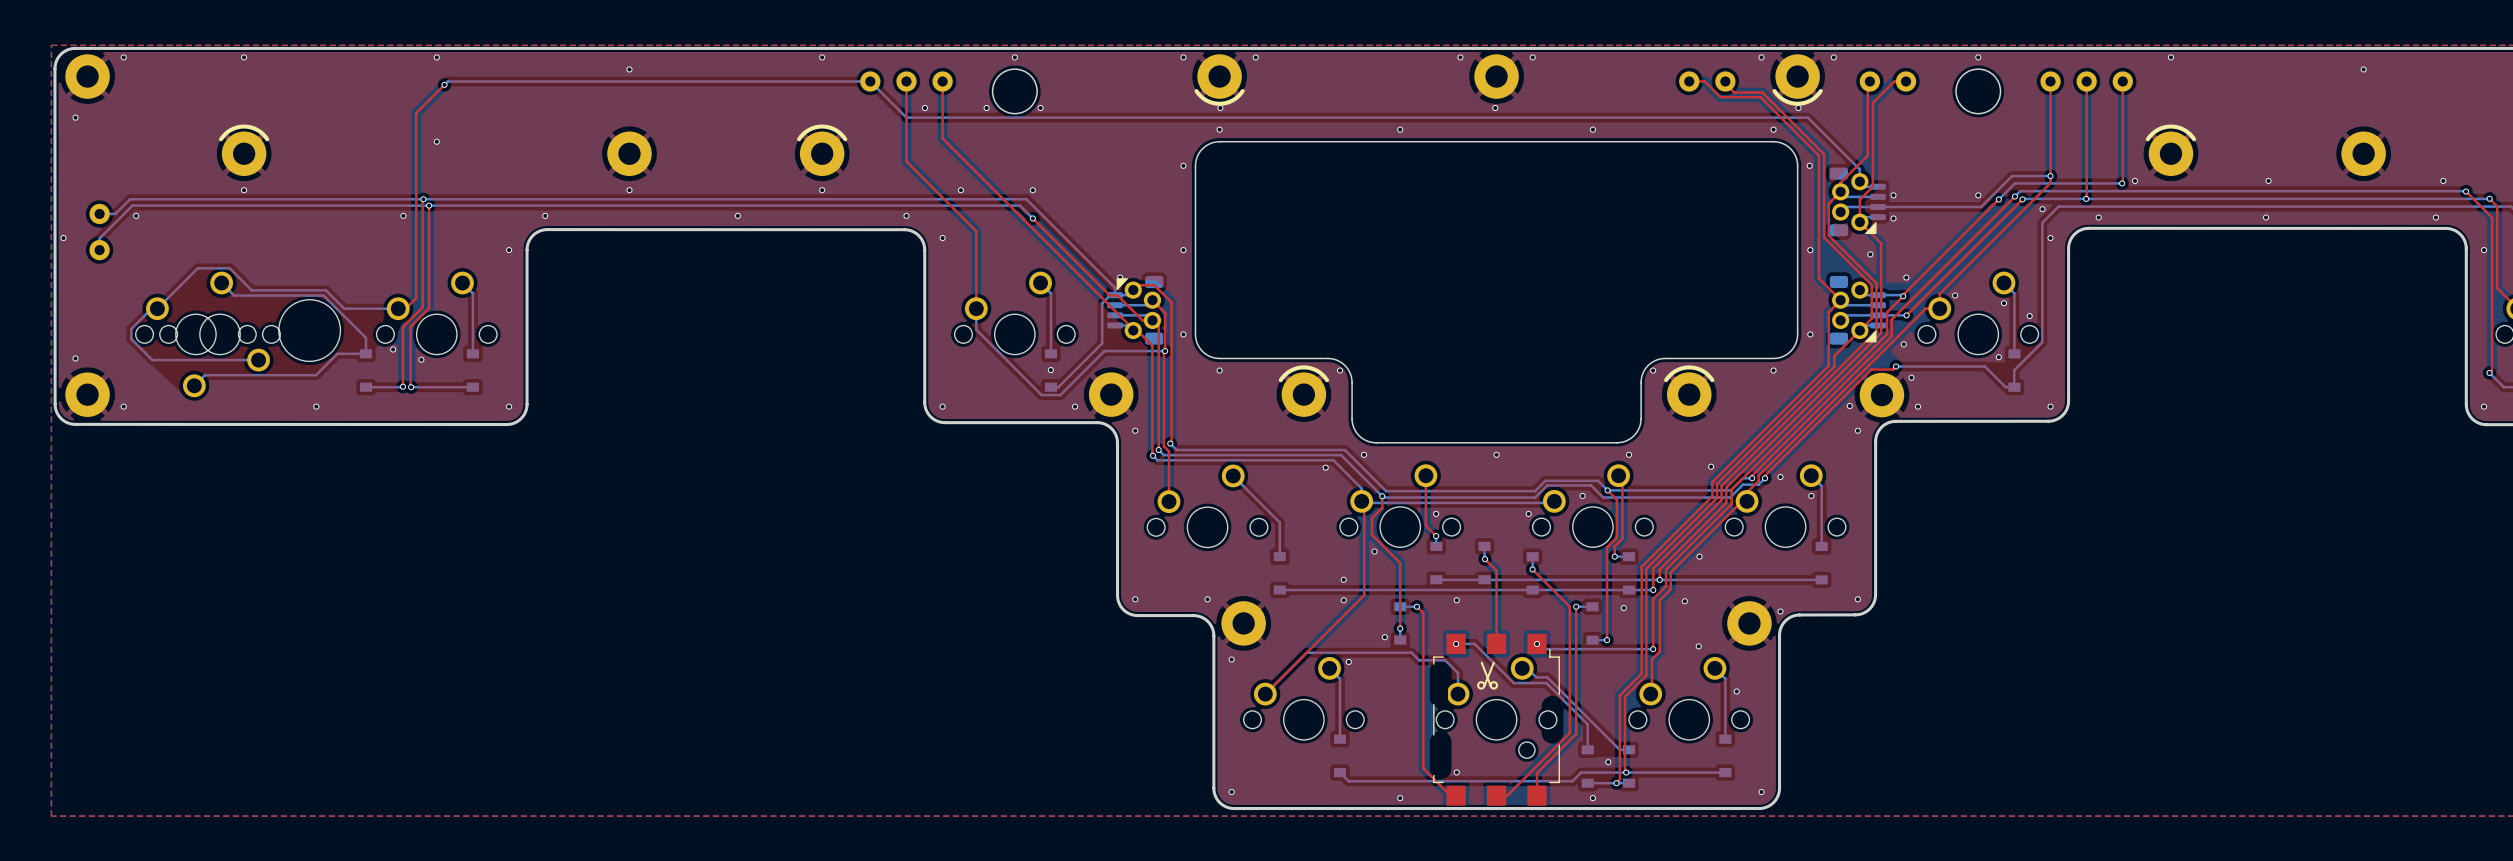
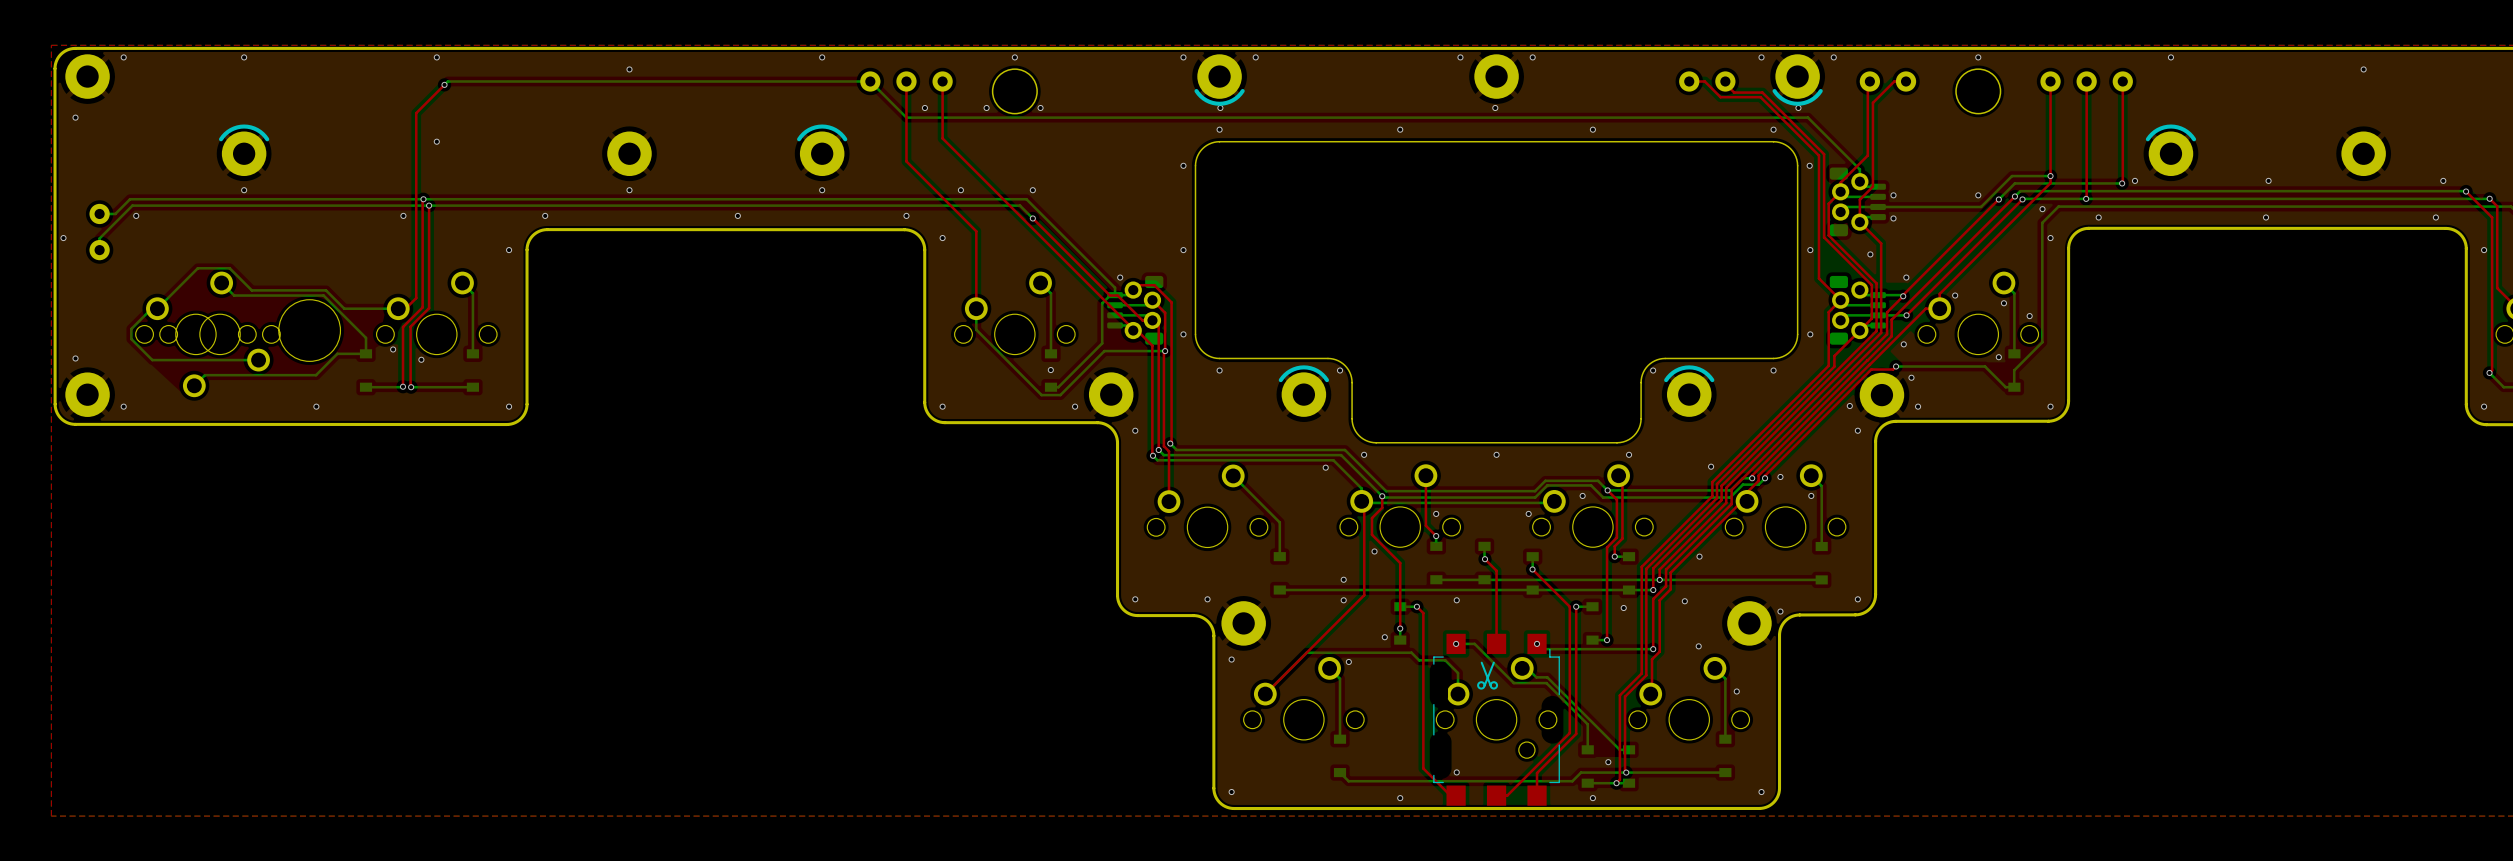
part footprint: [1829, 167, 1886, 237] -> [1829, 167, 1886, 237]
part footprint: [1107, 275, 1164, 345] -> [1107, 275, 1164, 345]
part footprint: [1829, 275, 1886, 345] -> [1829, 275, 1886, 345]

